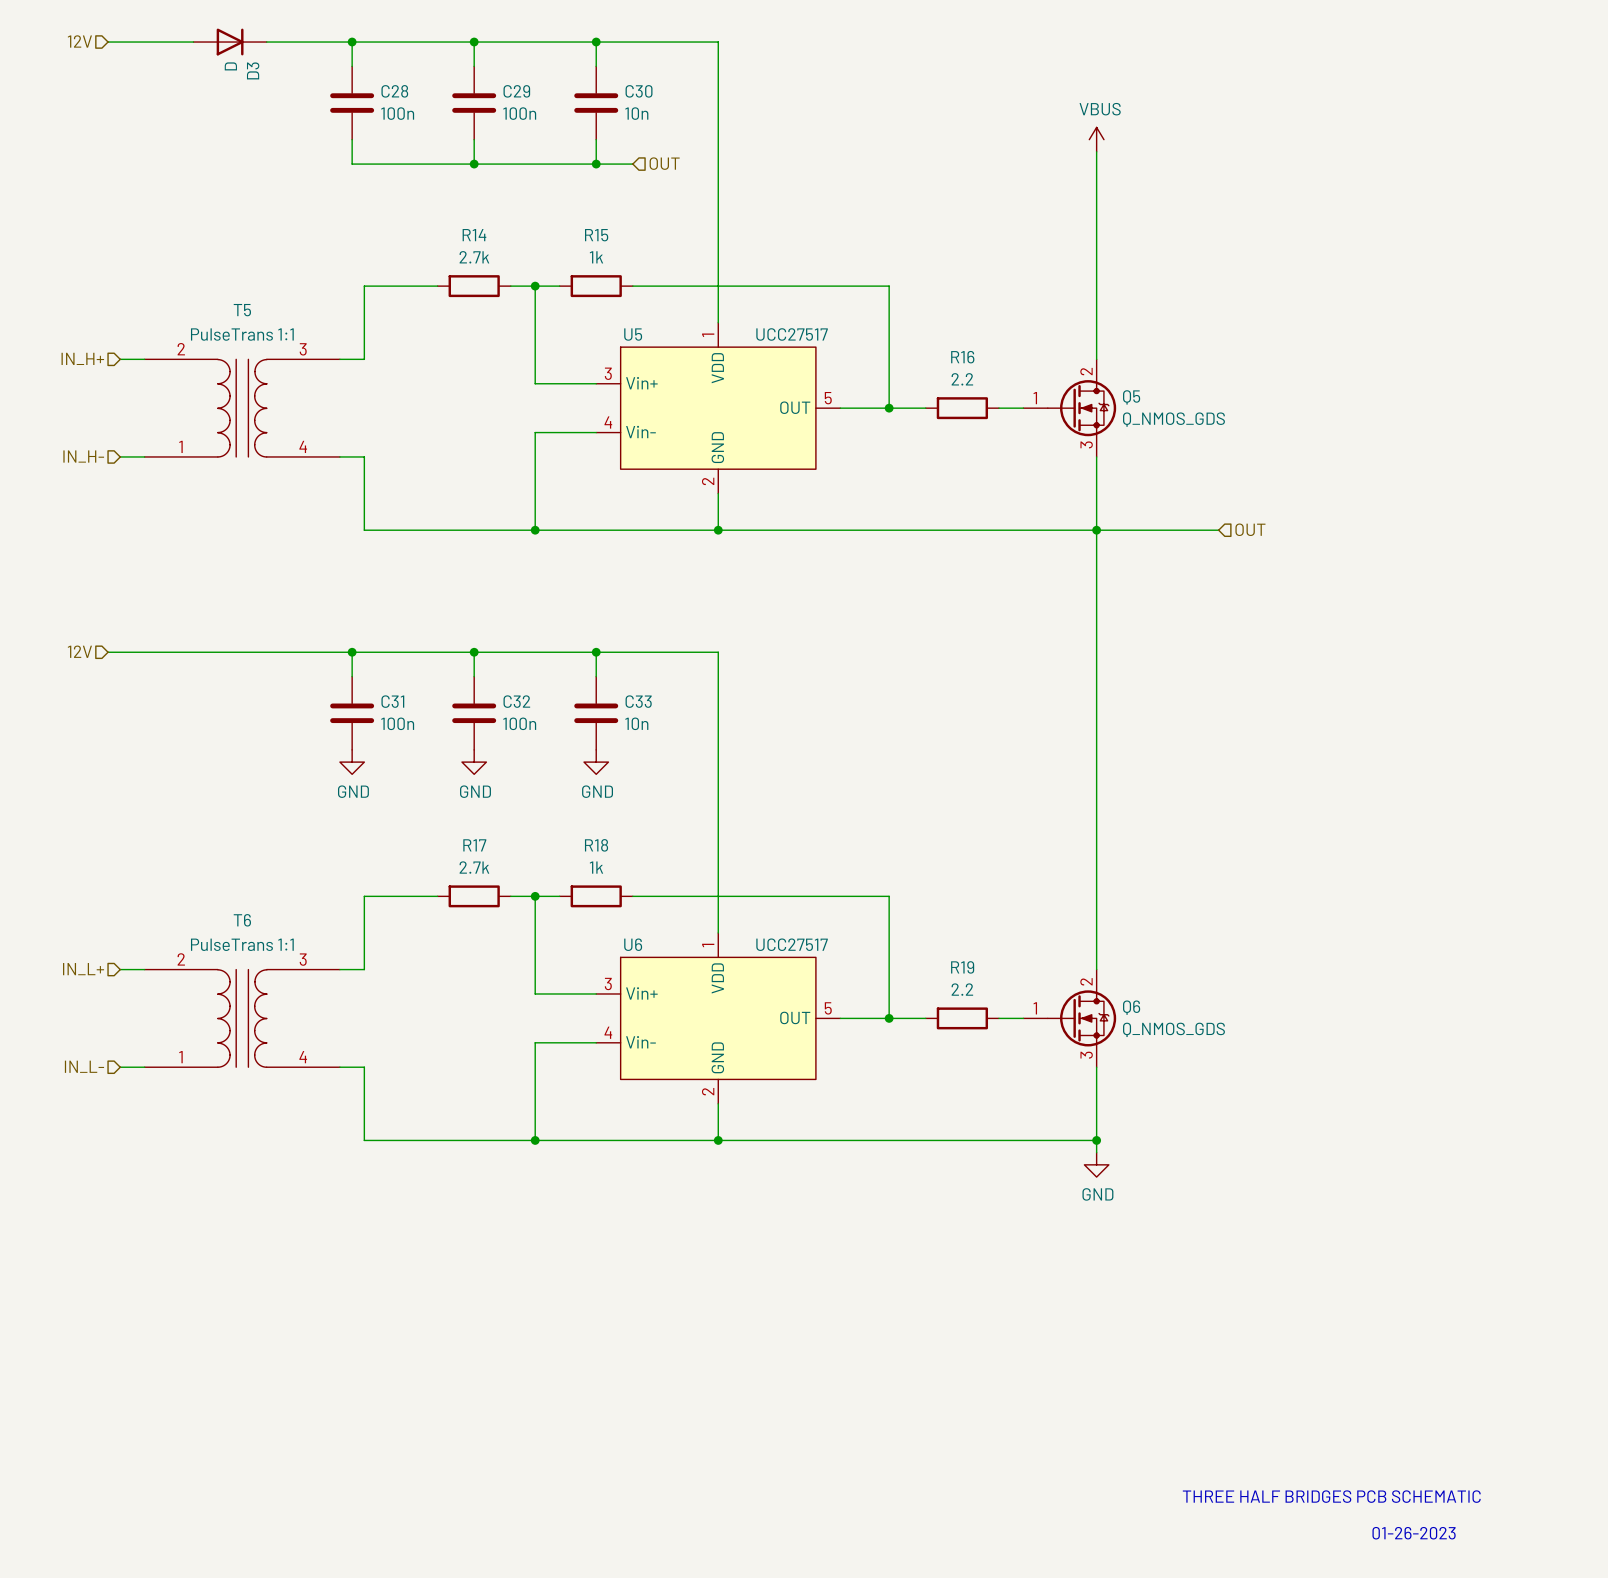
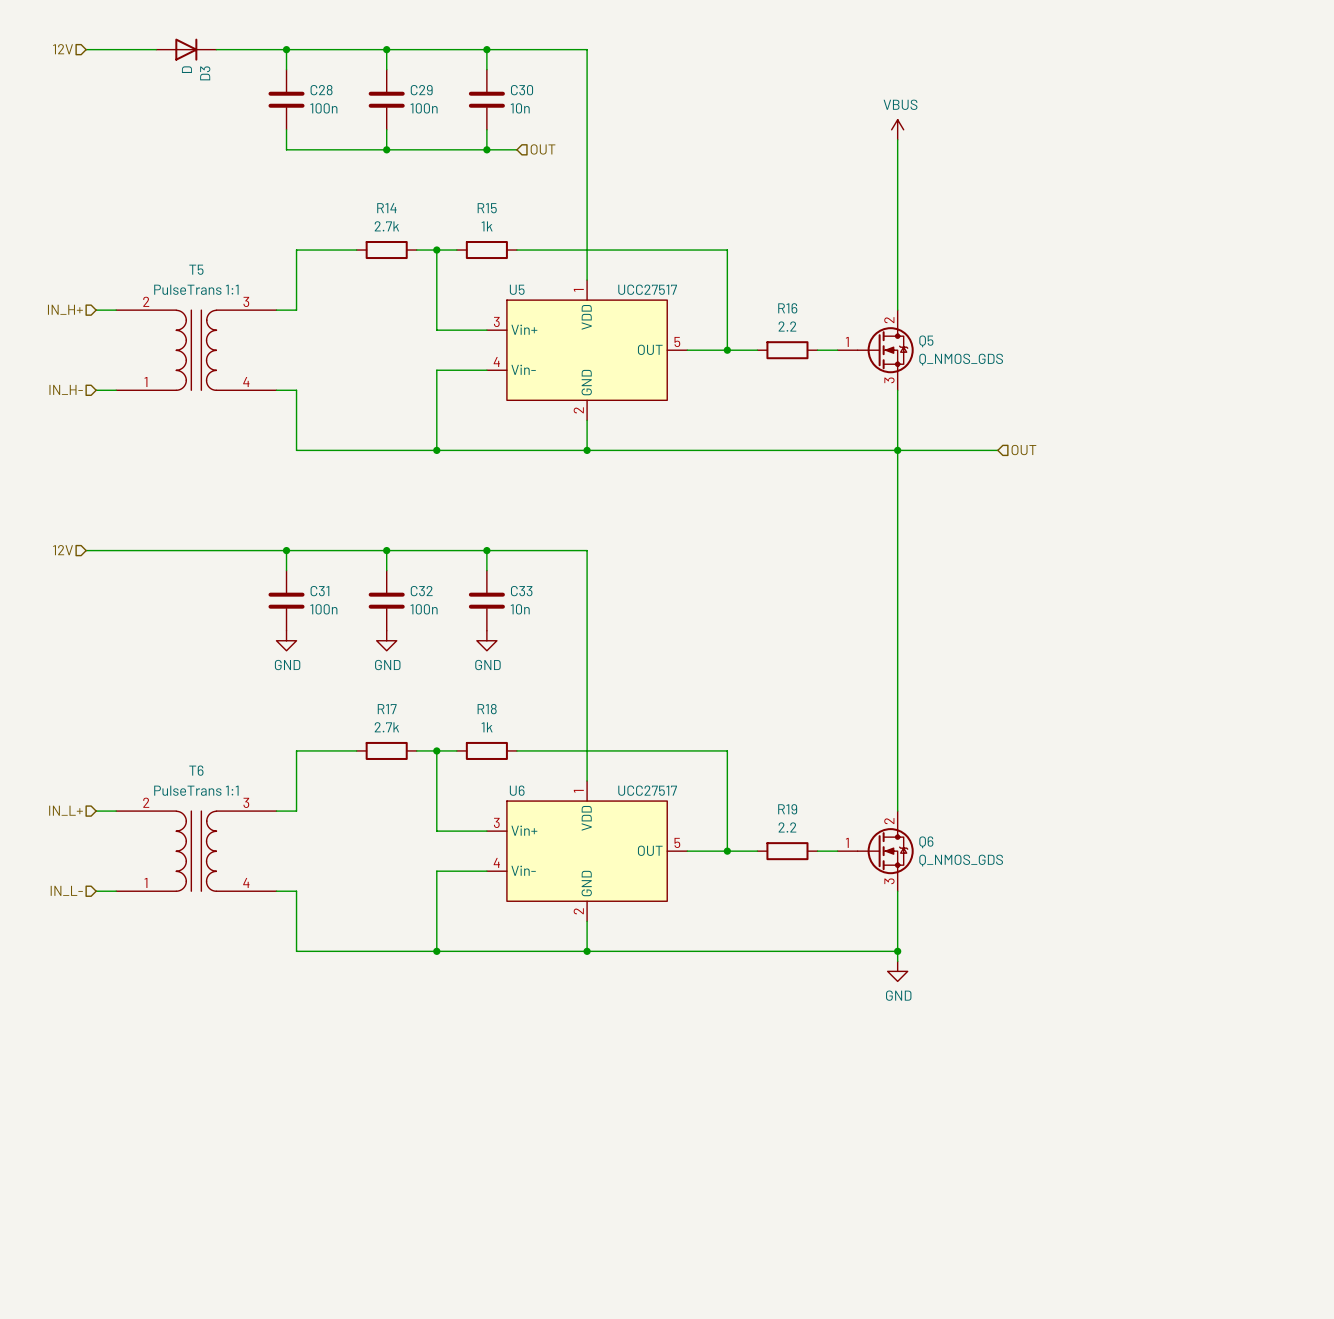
text: THREE HALF BRIDGES PCB SCHEMATIC (1331, 1496) -> none
text: 01-26-2023 (1414, 1533) -> none

